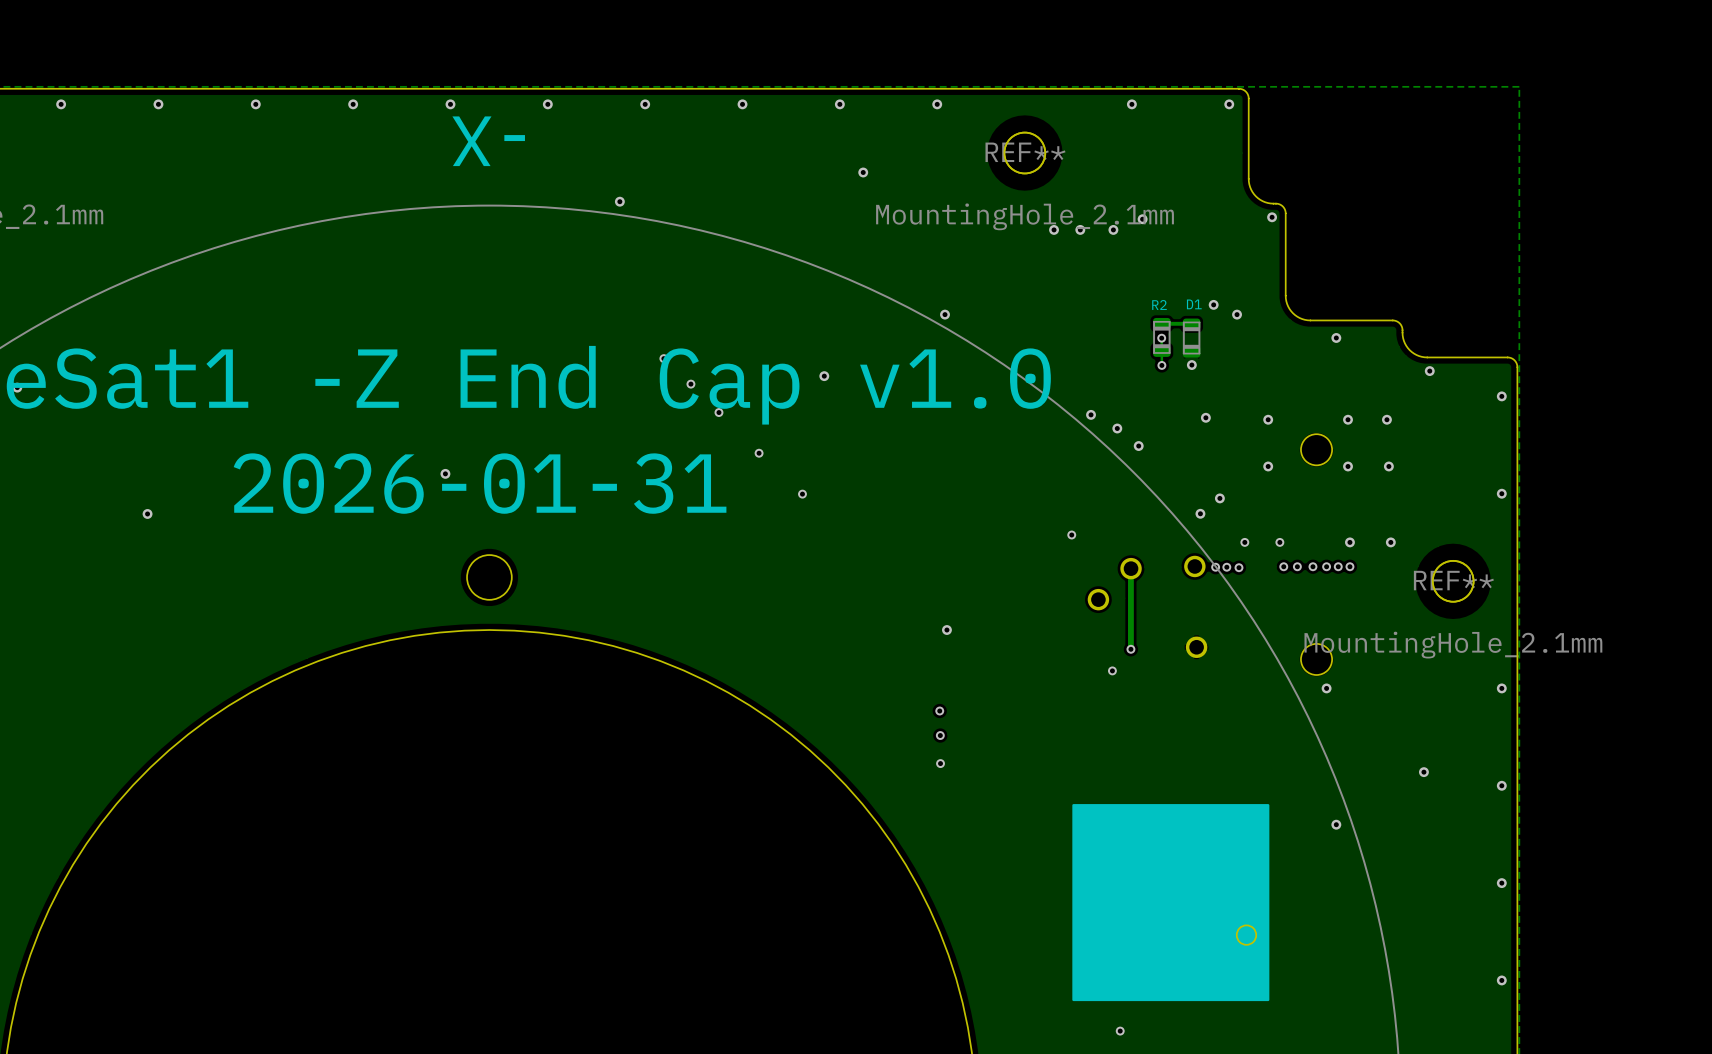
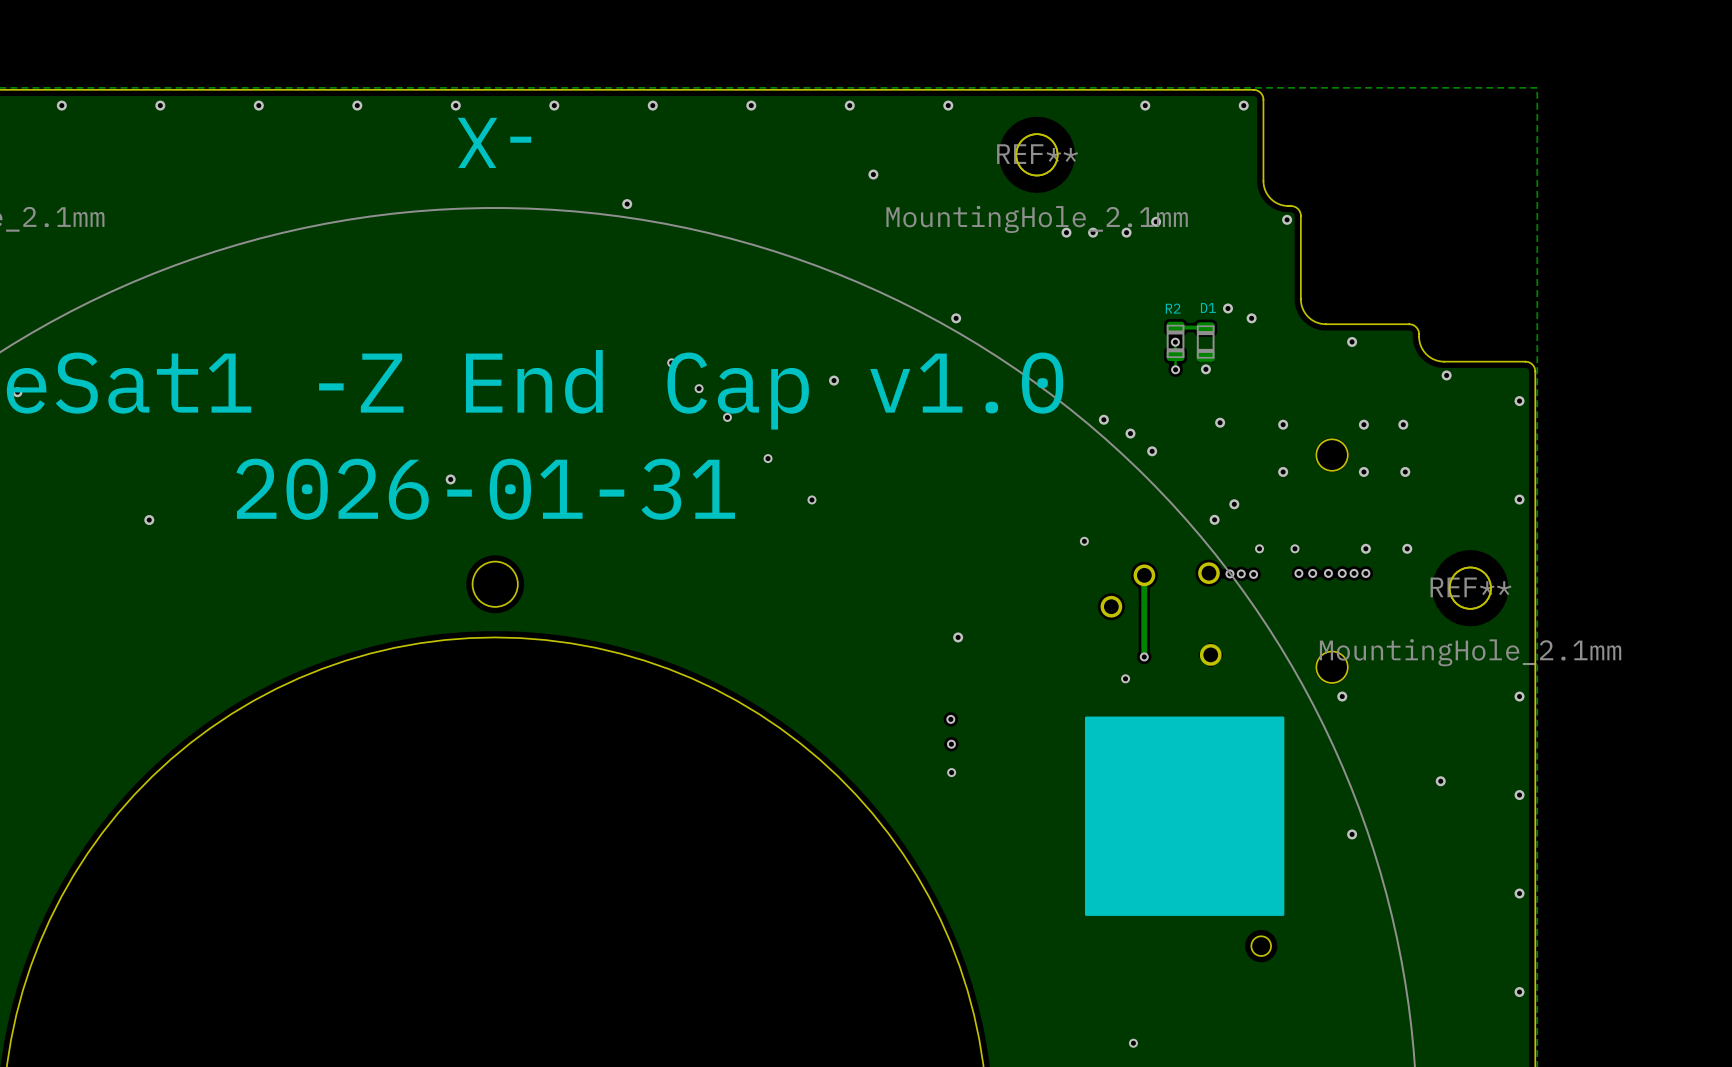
drawing position: (1170, 902) -> (1184, 816)

